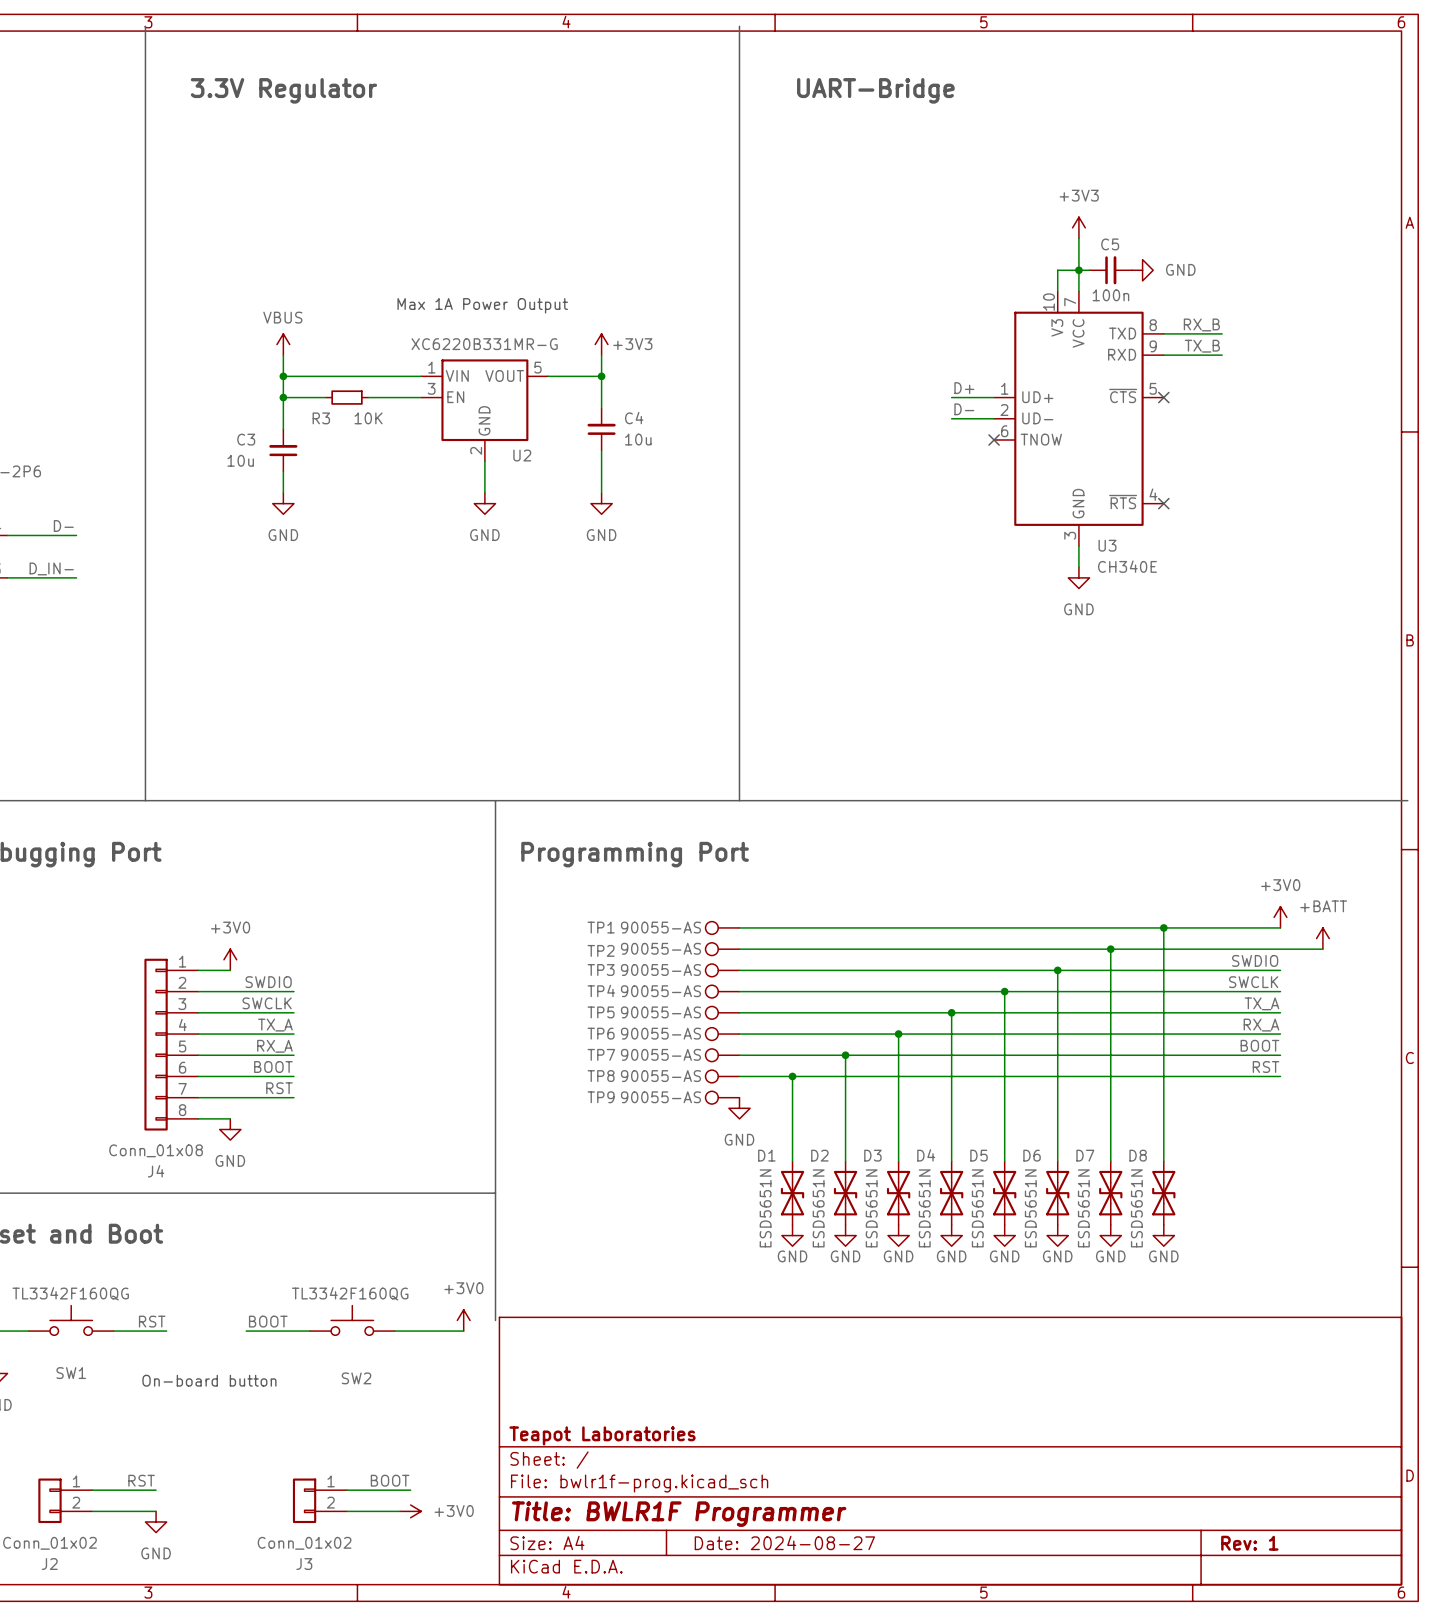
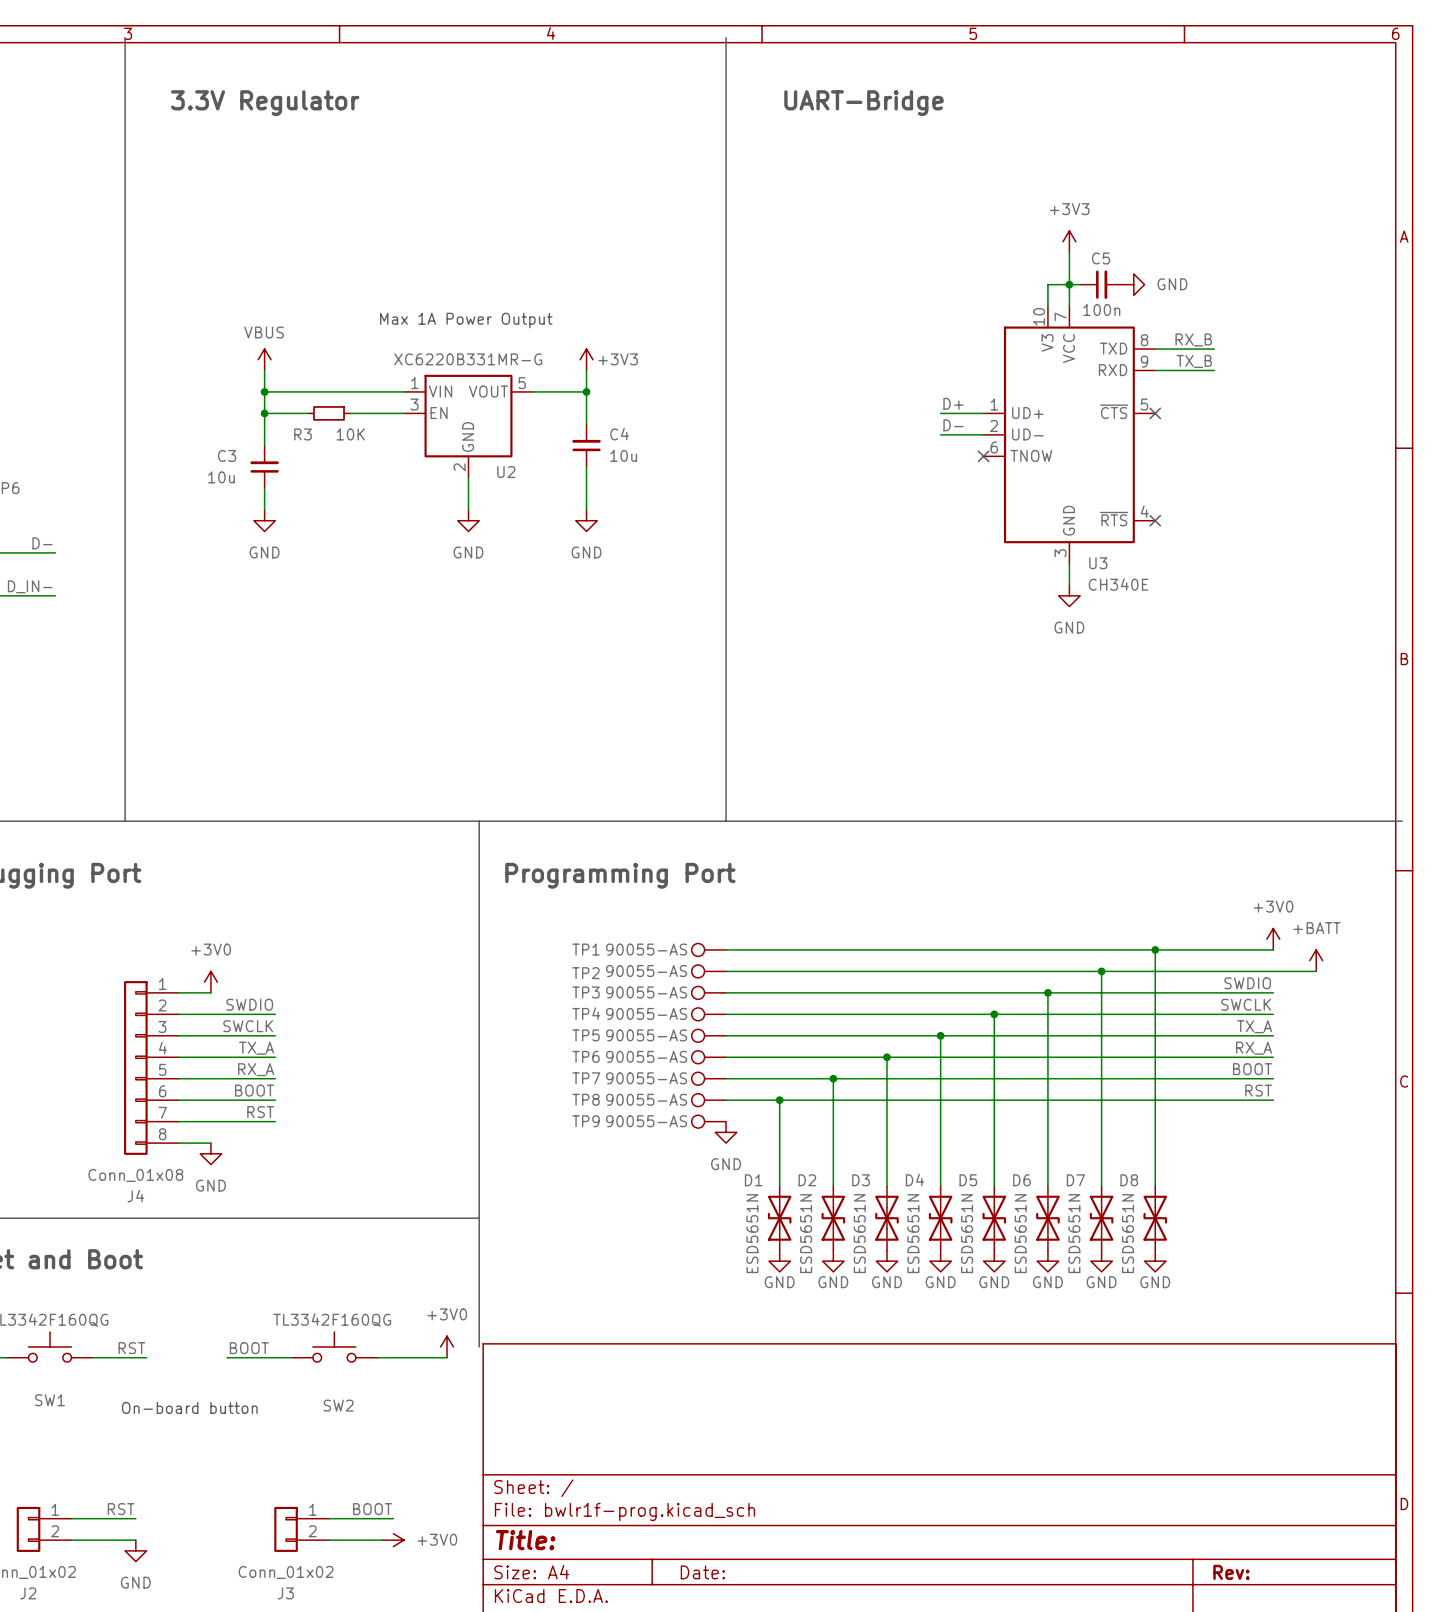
title block: Teapot Laboratories (602, 1435) -> none
title block: Title: BWLR1F Programmer (679, 1514) -> Title: (525, 1540)
title block: Date: 2024-08-27 (784, 1542) -> Date: (702, 1572)
title block: Rev: 1 (1249, 1543) -> Rev: (1231, 1572)

